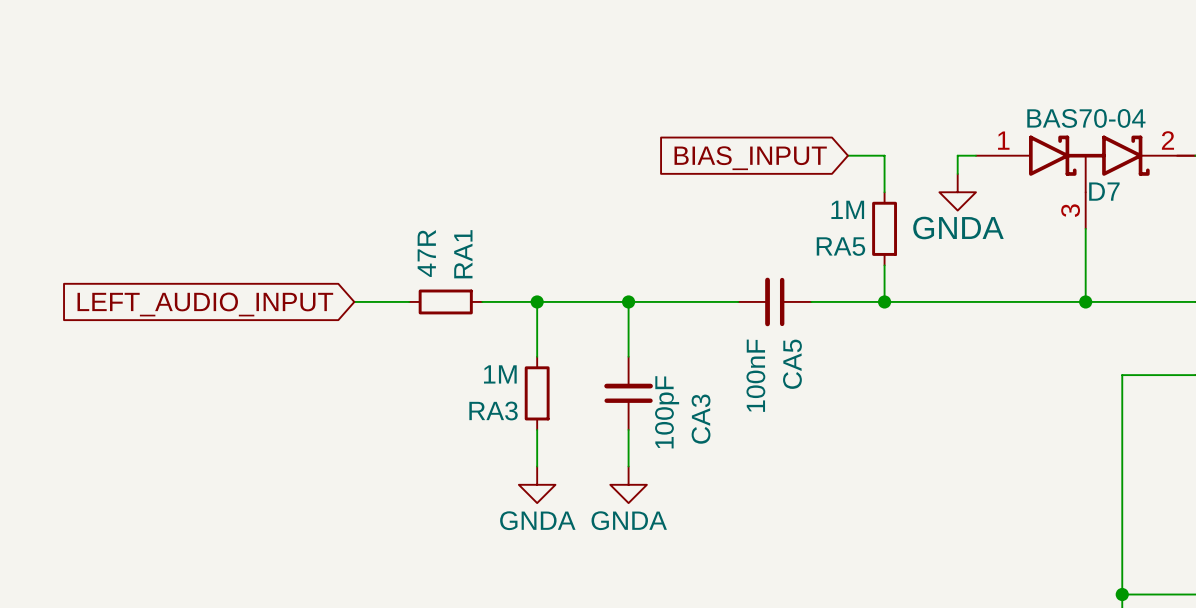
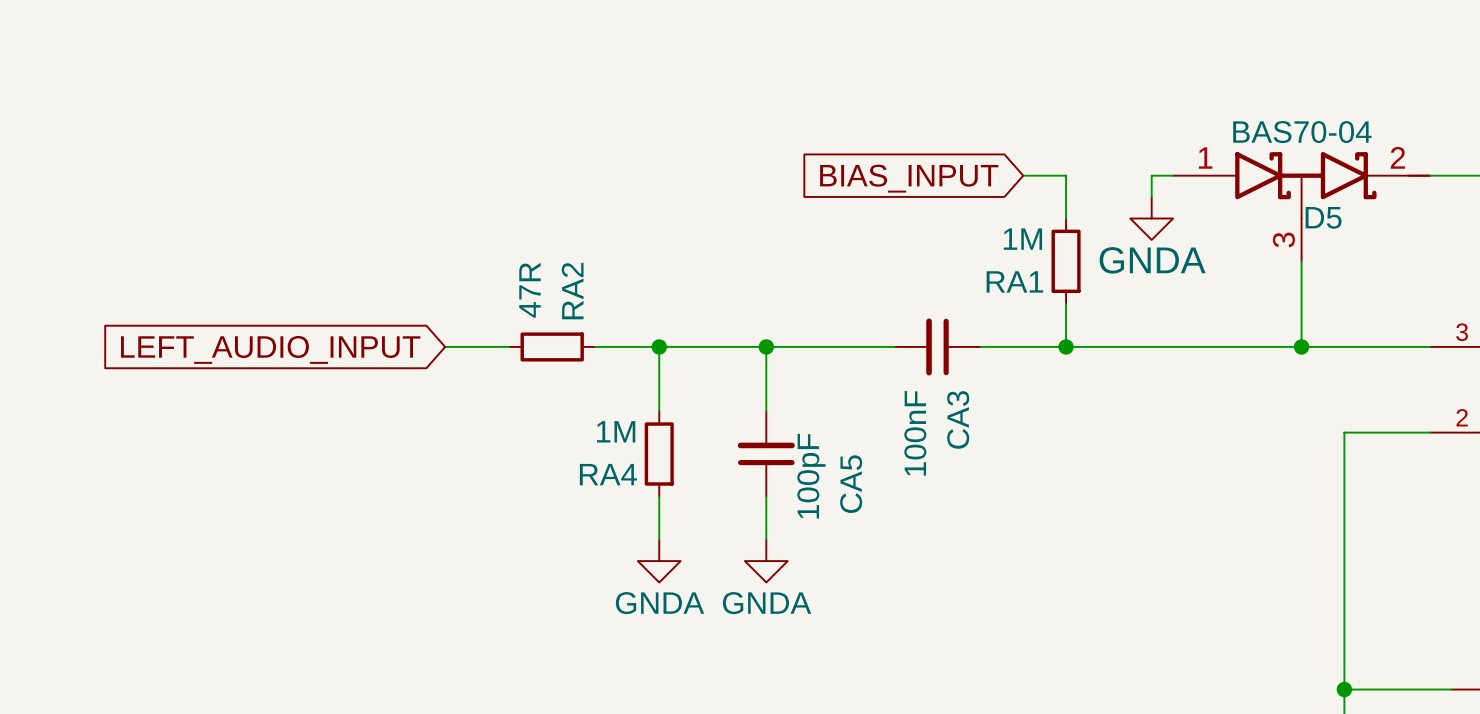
D7 name: D7 (1104, 191) -> D5 (1323, 217)
RA5 name: RA5 (840, 246) -> RA1 (1014, 281)
RA1 name: RA1 (463, 254) -> RA2 (572, 291)
CA5 name: CA5 (792, 364) -> CA3 (958, 419)
RA3 name: RA3 (493, 410) -> RA4 (608, 474)
CA3 name: CA3 (701, 419) -> CA5 (851, 484)

